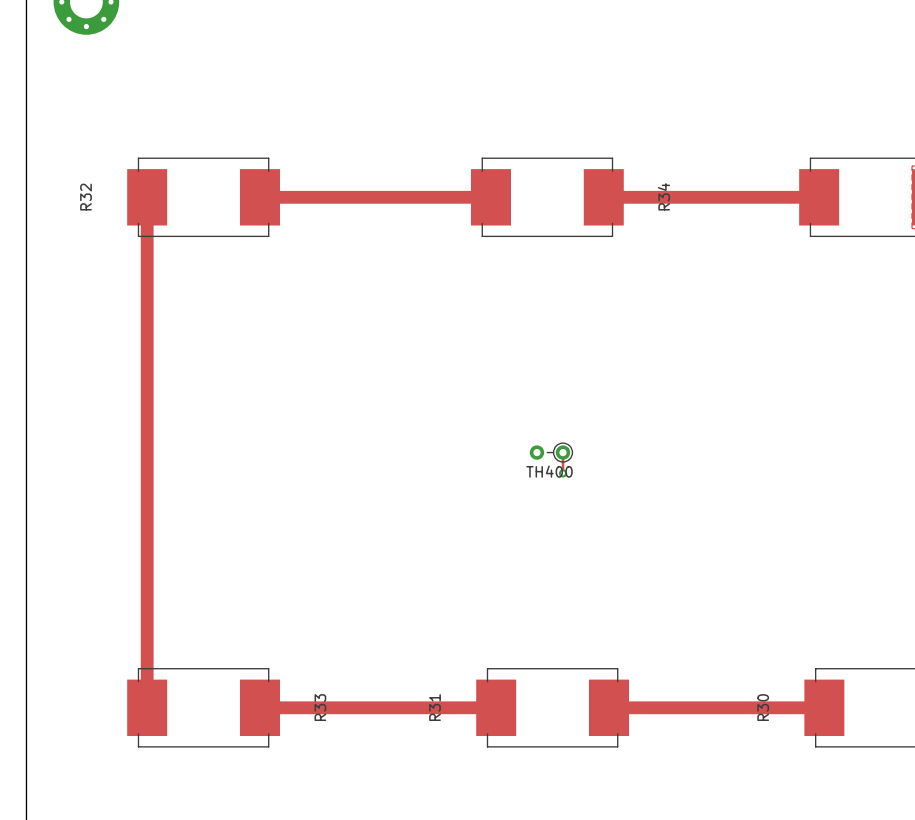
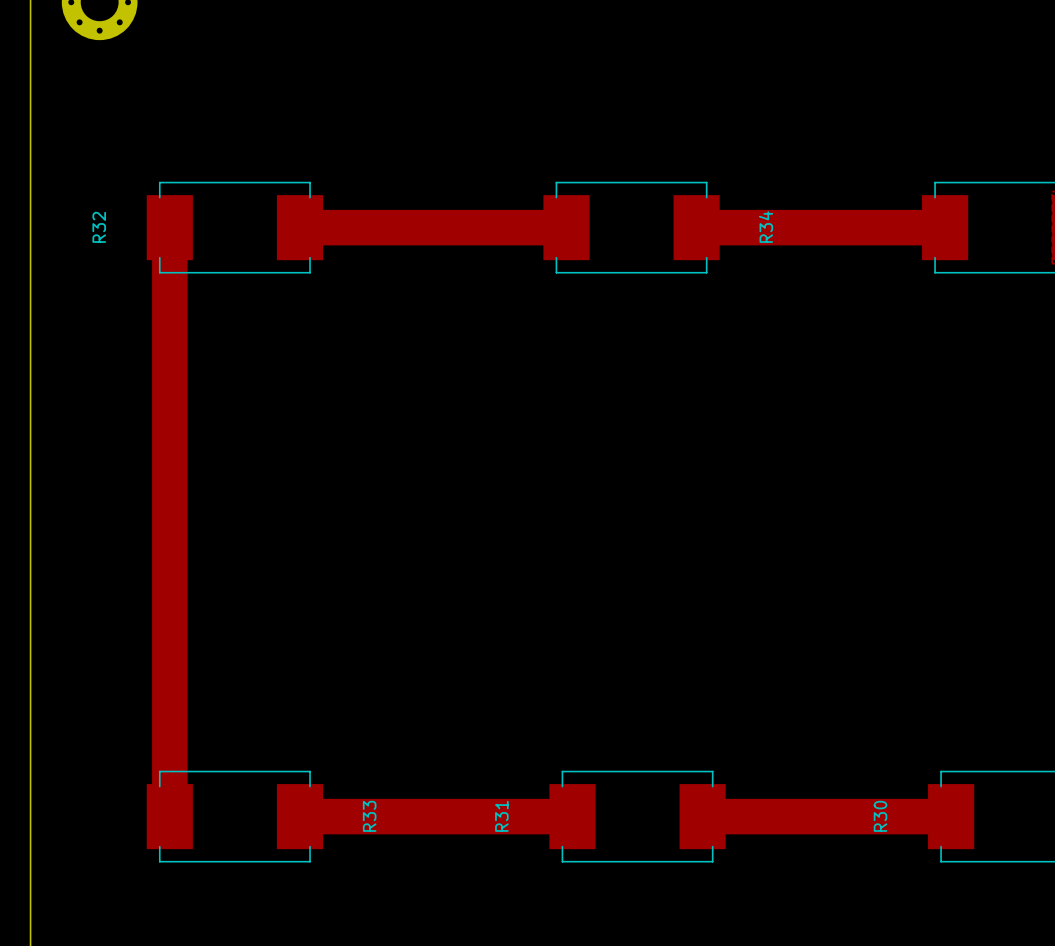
track width: thin (271, 197) (490, 197) -> thick (312, 227) (566, 227)
track width: thin (603, 197) (813, 197) -> thick (696, 227) (938, 227)
track width: thin (147, 212) (147, 707) -> thick (169, 245) (169, 816)
TH400: (551, 452) -> none
track: (563, 452) (563, 473) -> none
via: (563, 473) -> none
track width: thin (271, 707) (491, 707) -> thick (313, 816) (567, 816)
track width: thin (615, 707) (824, 707) -> thick (710, 816) (951, 816)

